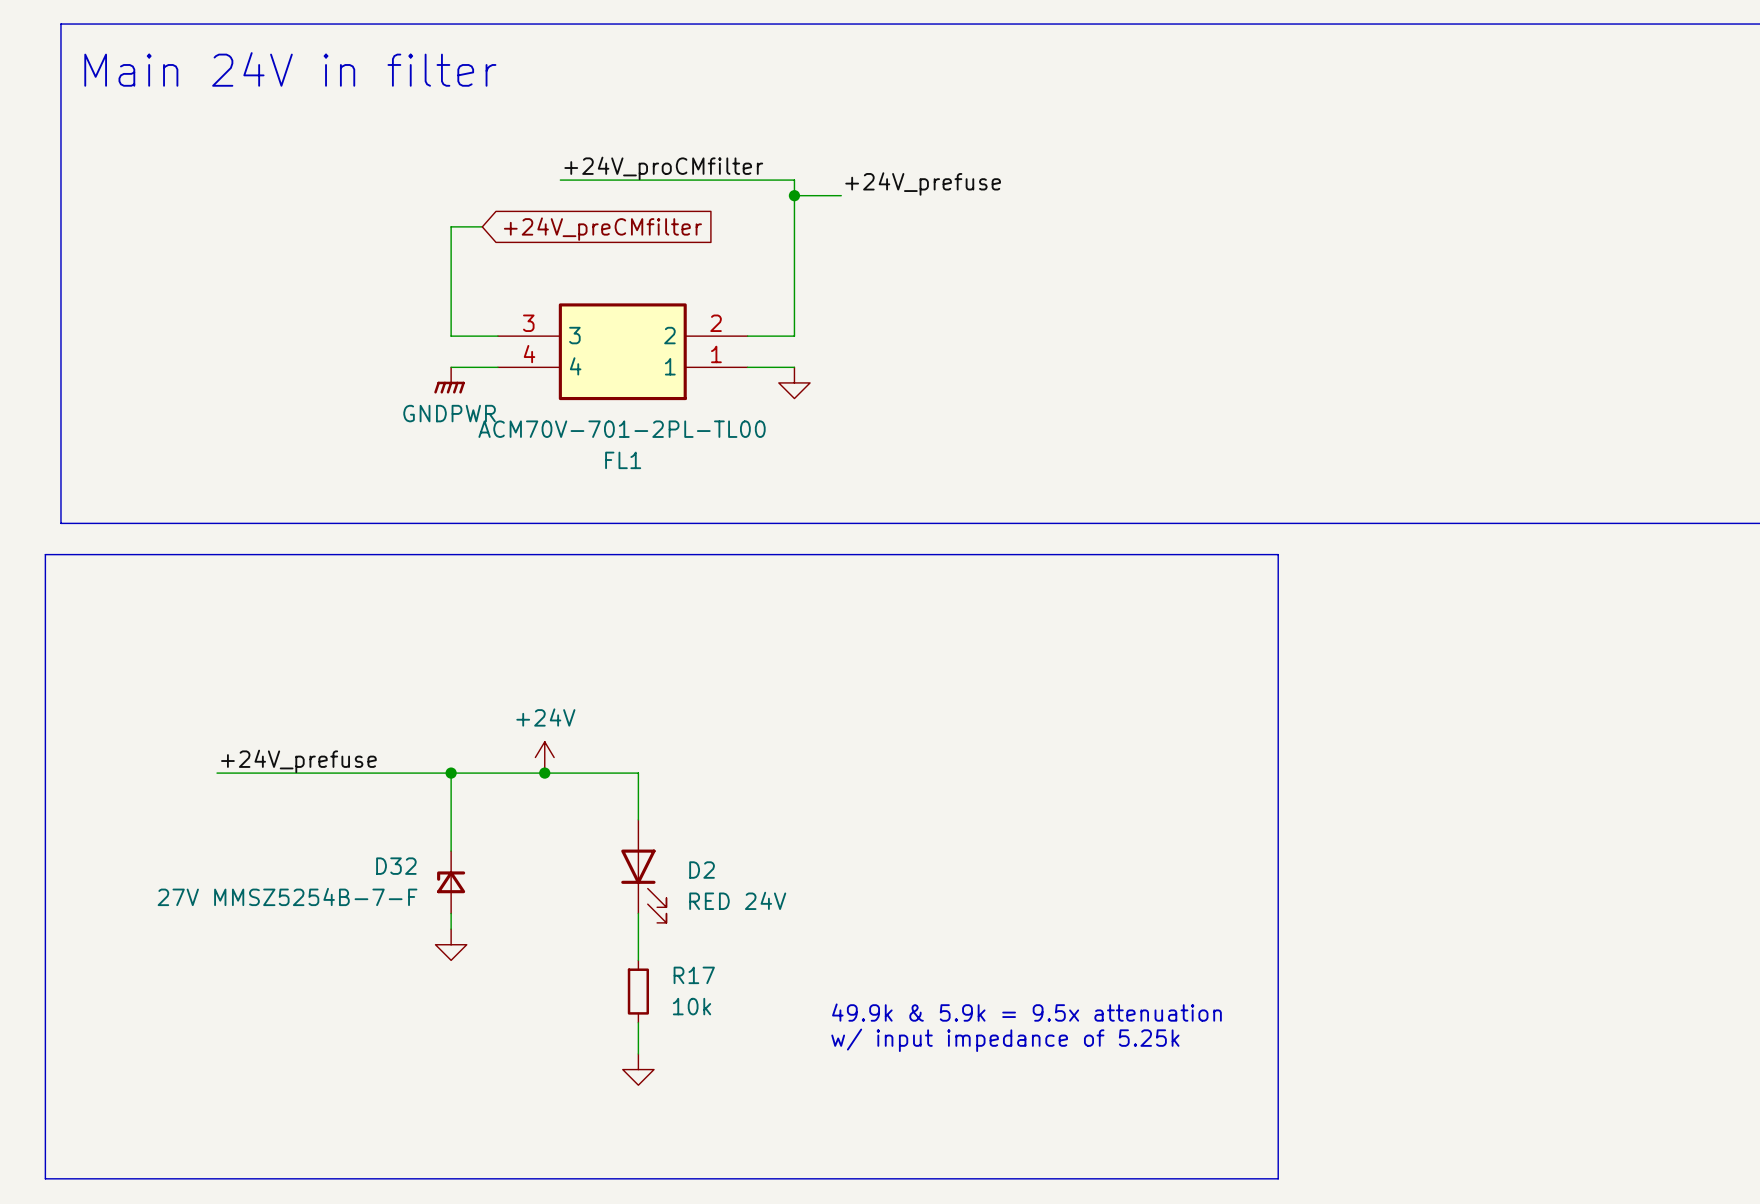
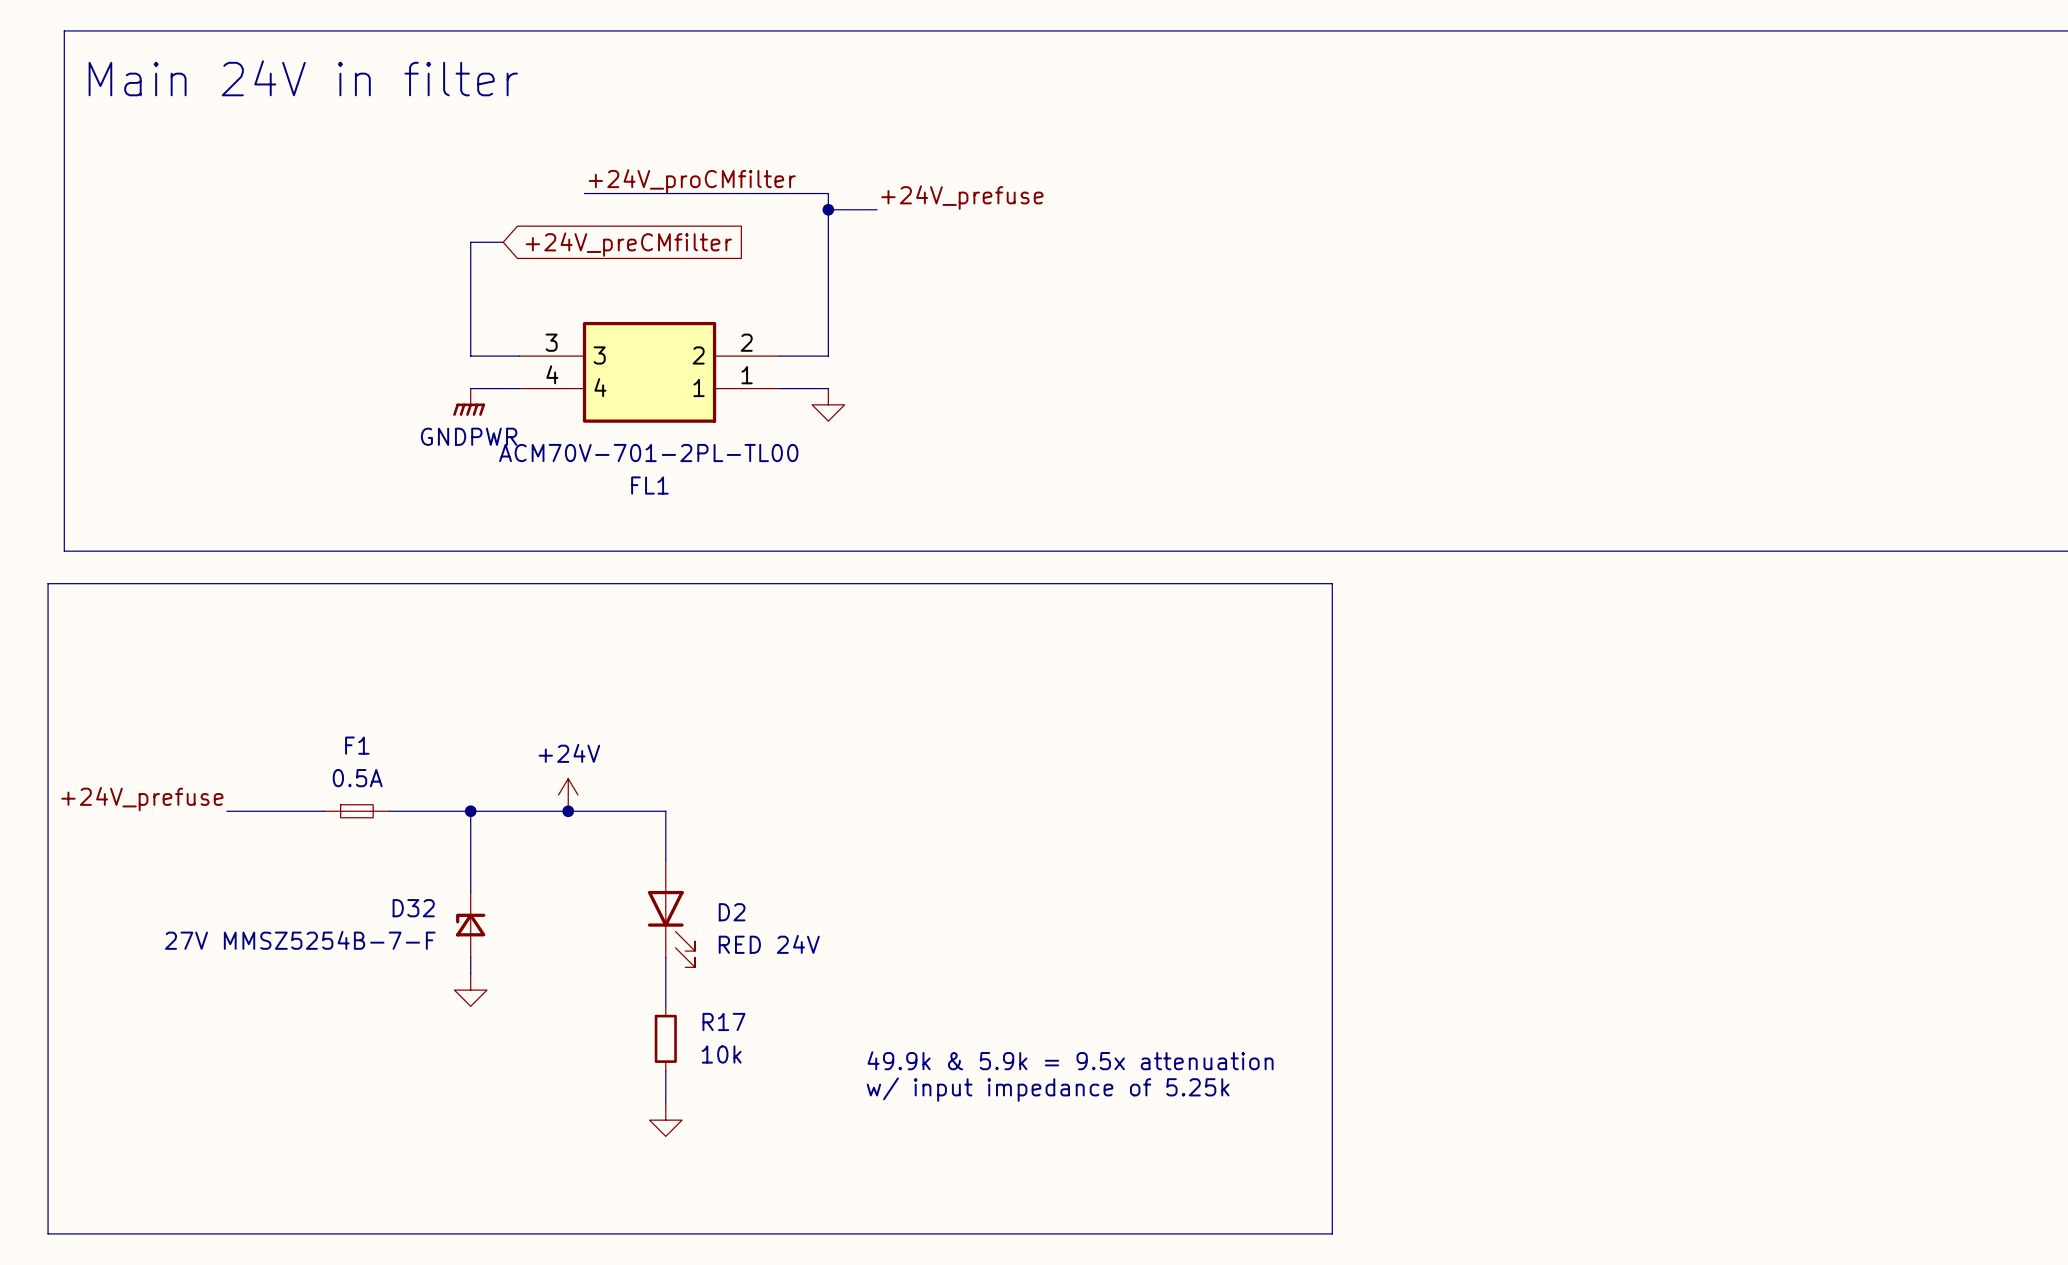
label position: +24V_prefuse (298, 761) -> +24V_prefuse (142, 799)
F1: none -> 0.5A (356, 811)

